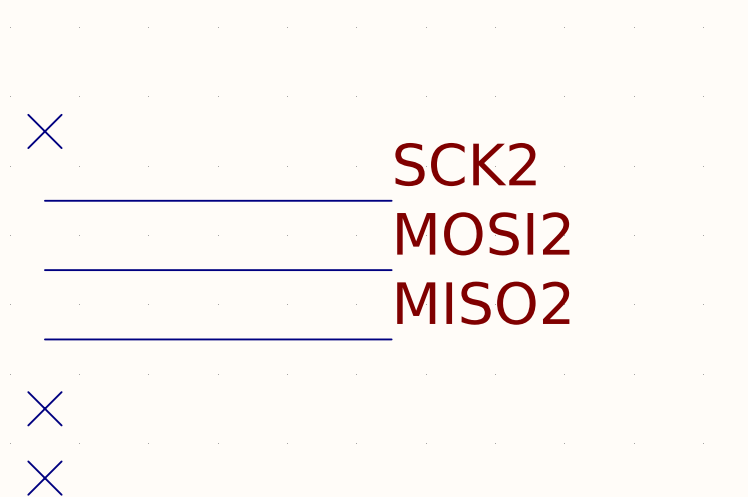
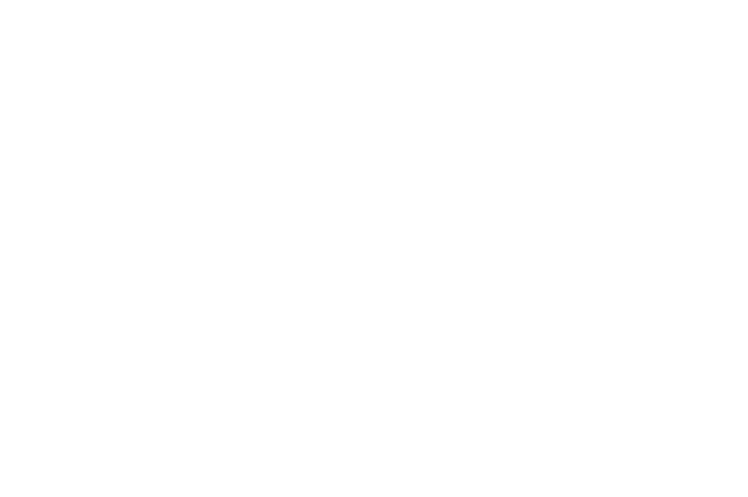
no-connect mark: (44, 131) -> none
label: SCK2 (465, 164) -> none
wire: (44, 200) (391, 200) -> none
label: MOSI2 (483, 233) -> none
wire: (44, 270) (391, 270) -> none
label: MISO2 (483, 303) -> none
wire: (44, 339) (391, 339) -> none
no-connect mark: (44, 408) -> none
no-connect mark: (44, 478) -> none

